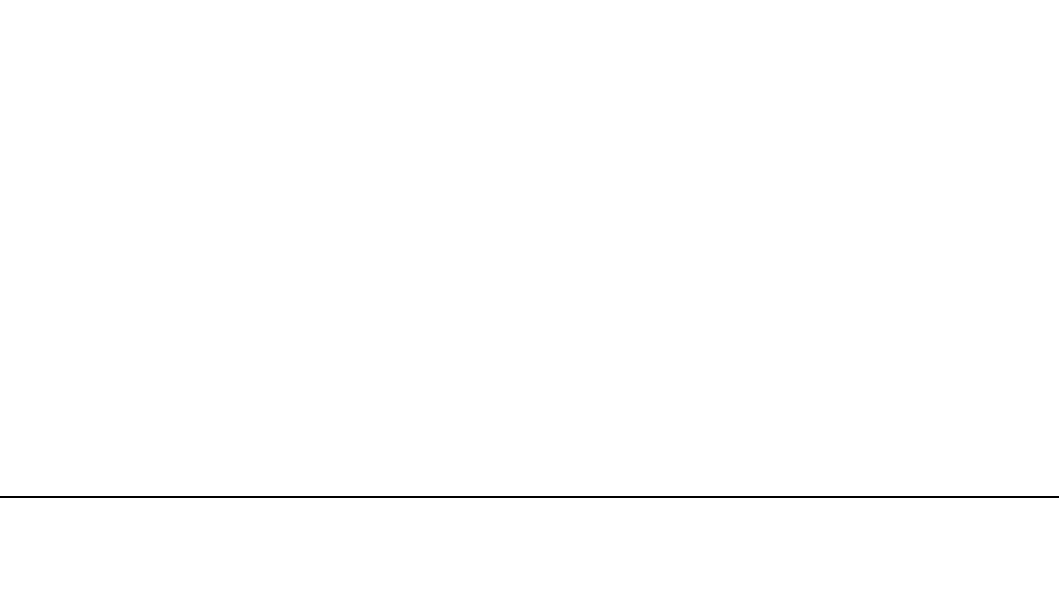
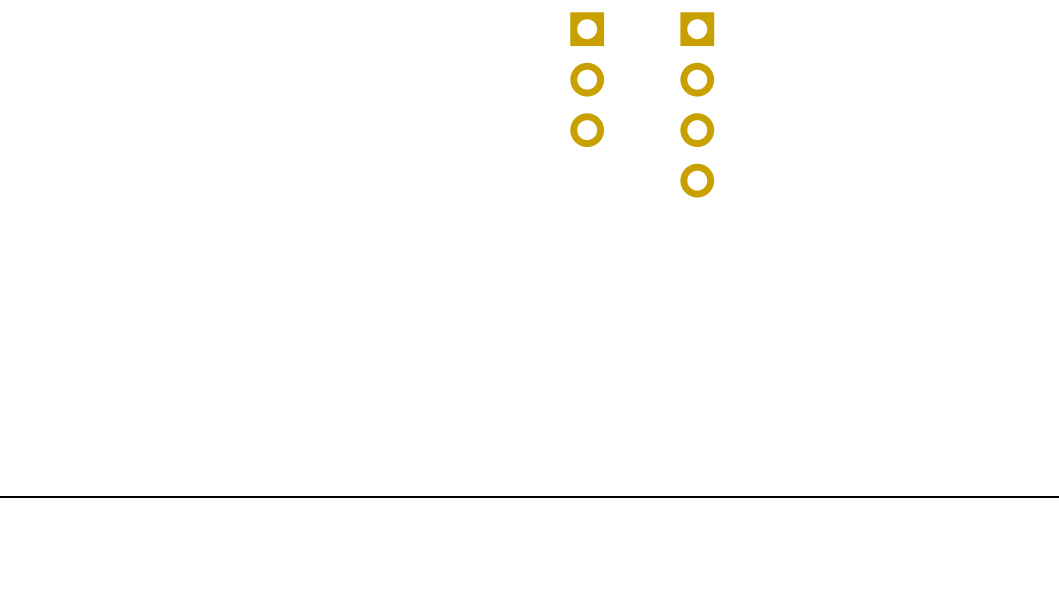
part: none -> (587, 79)
part: none -> (697, 104)

